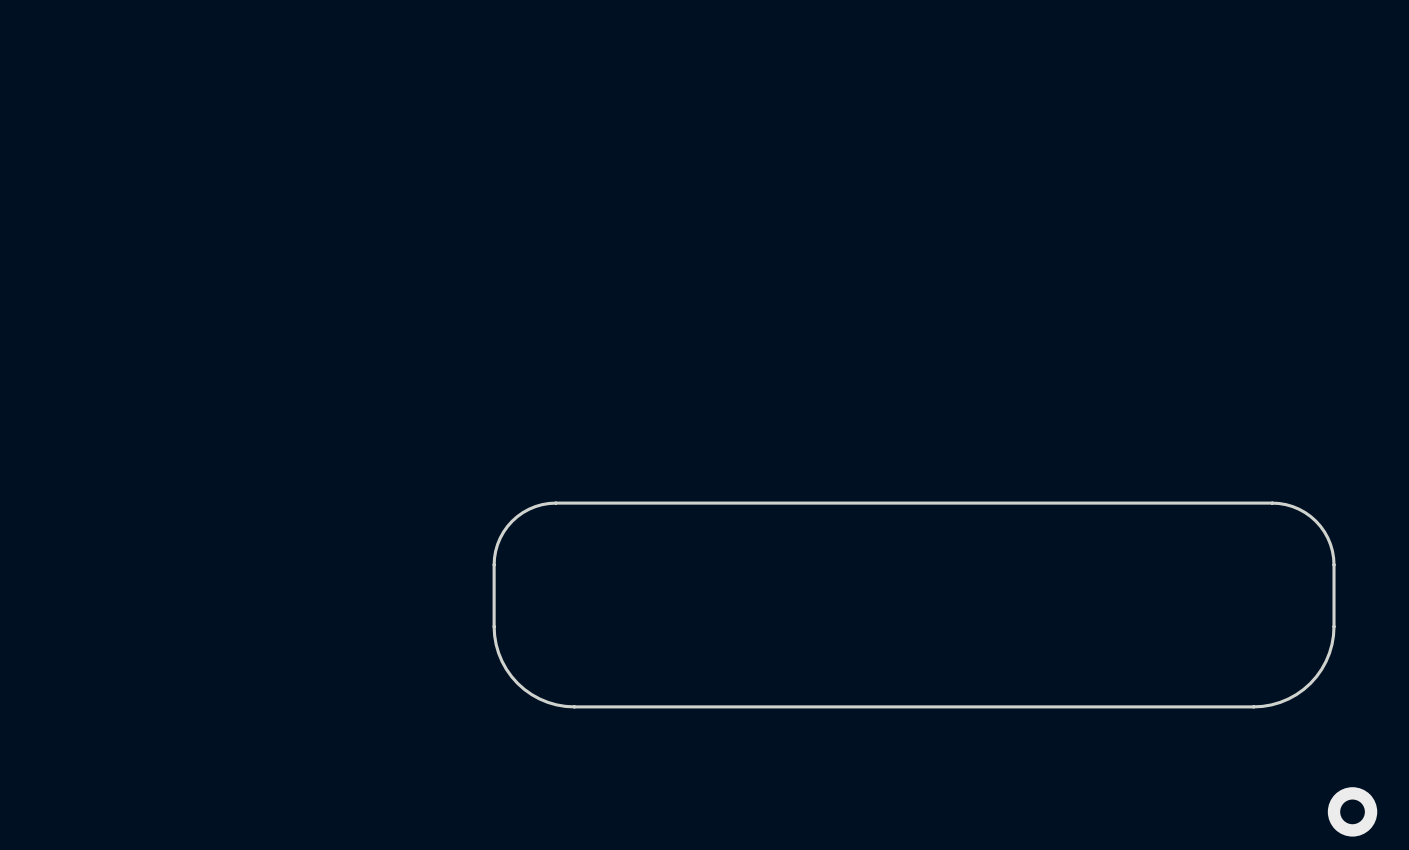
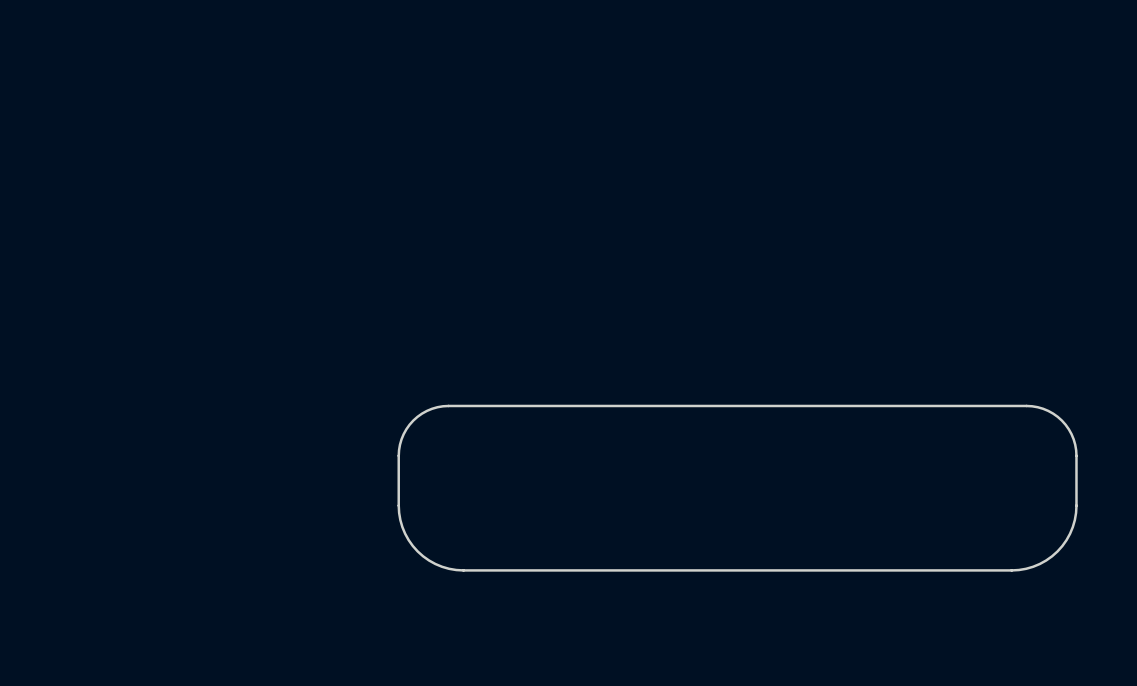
via: (1352, 811) -> none

